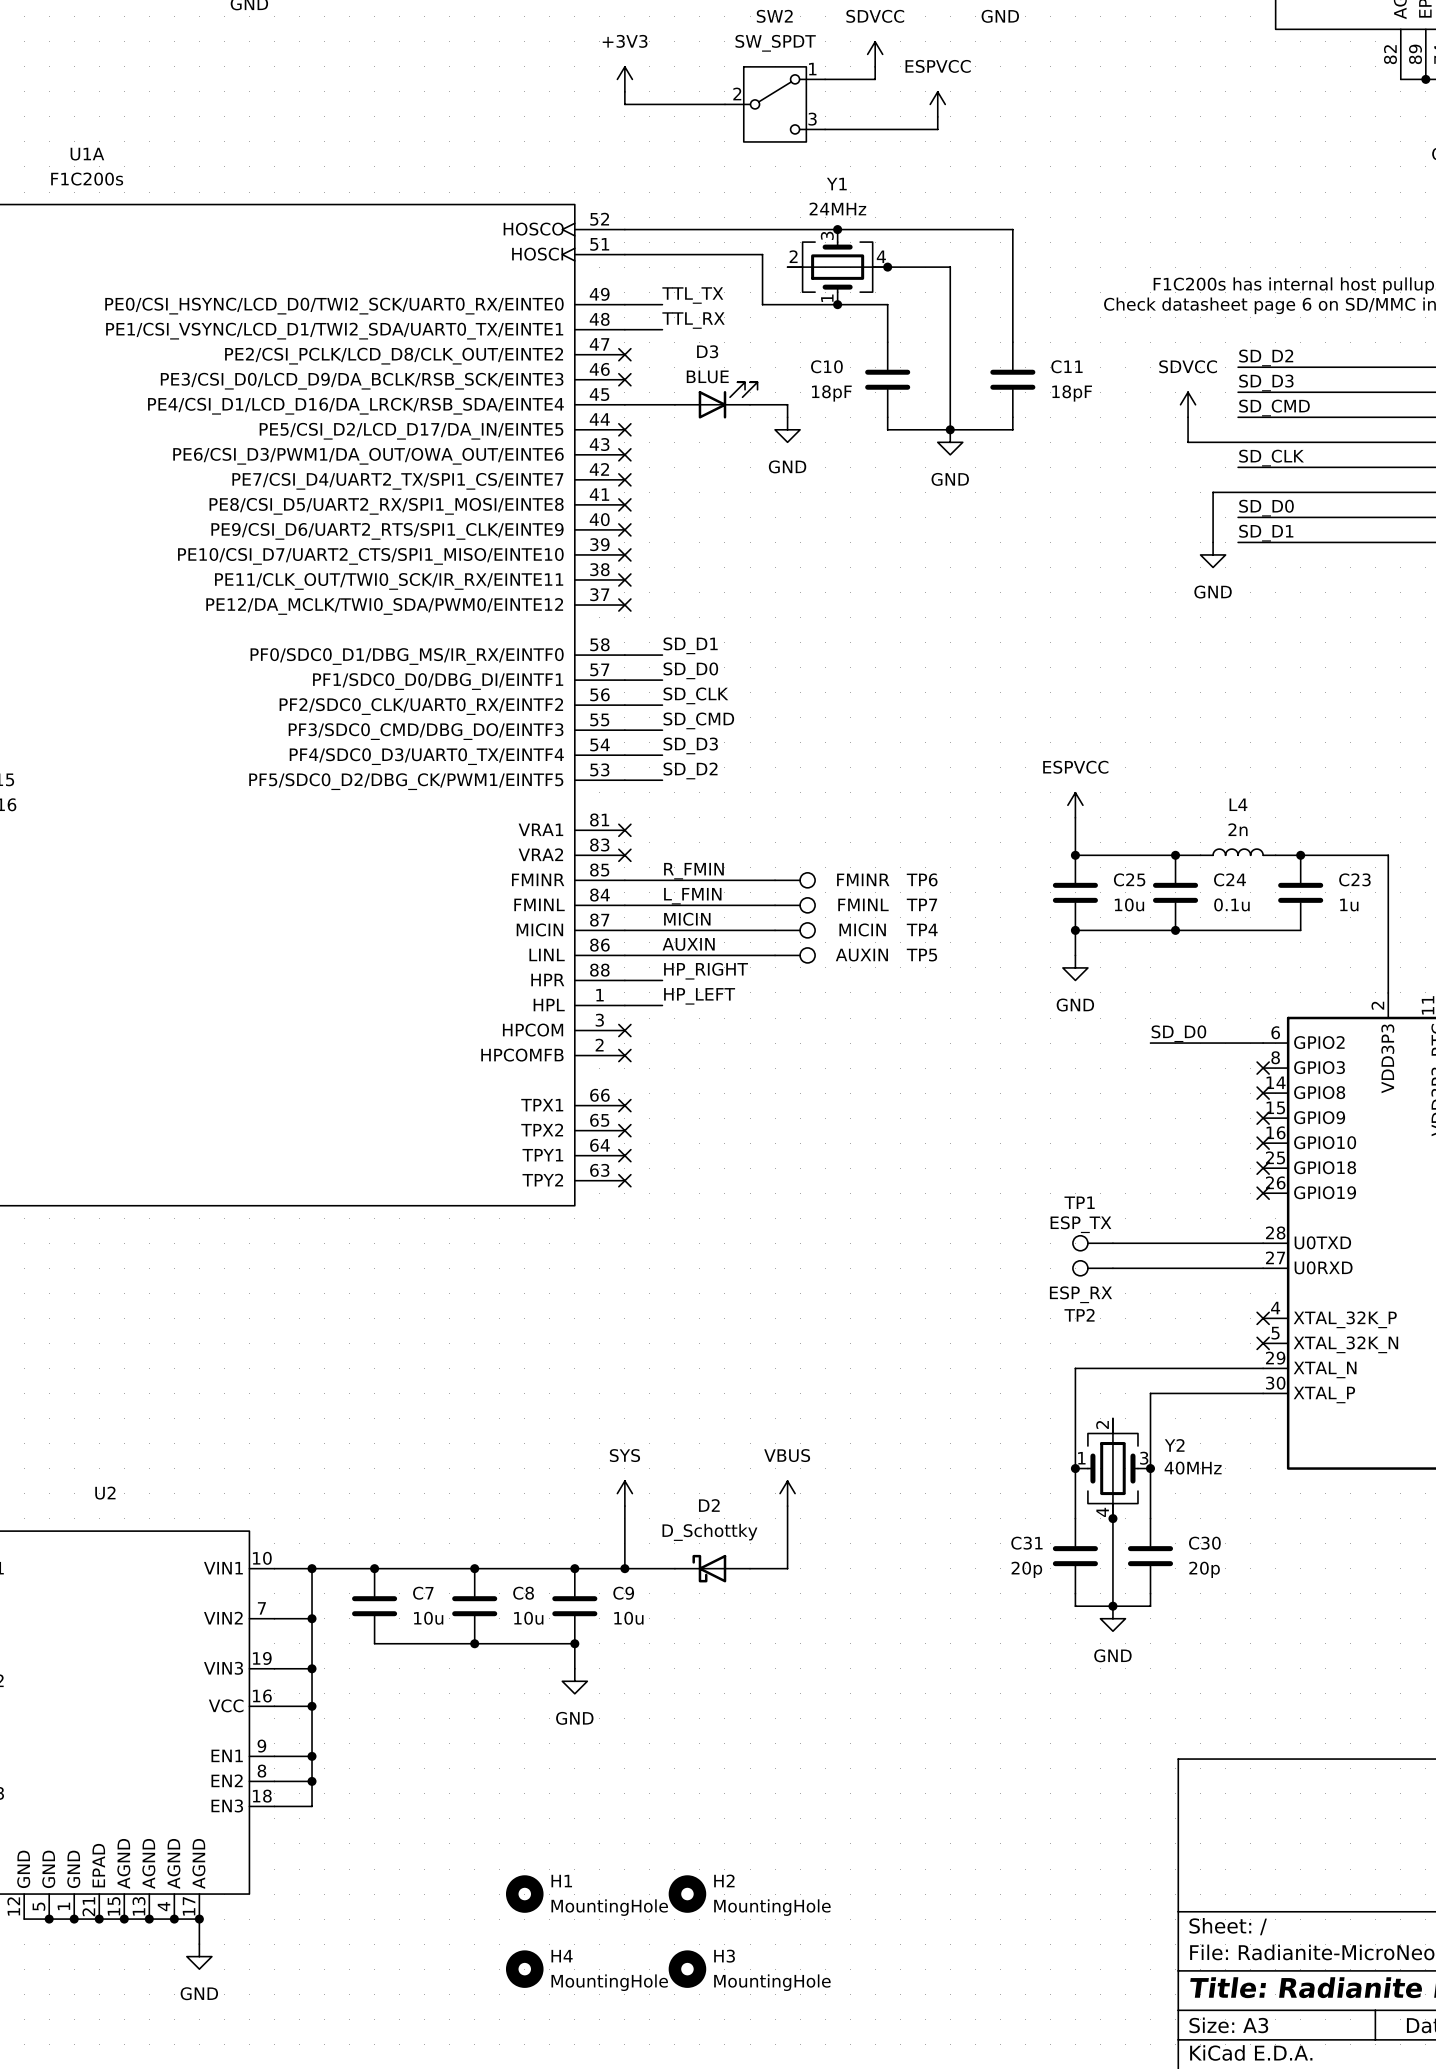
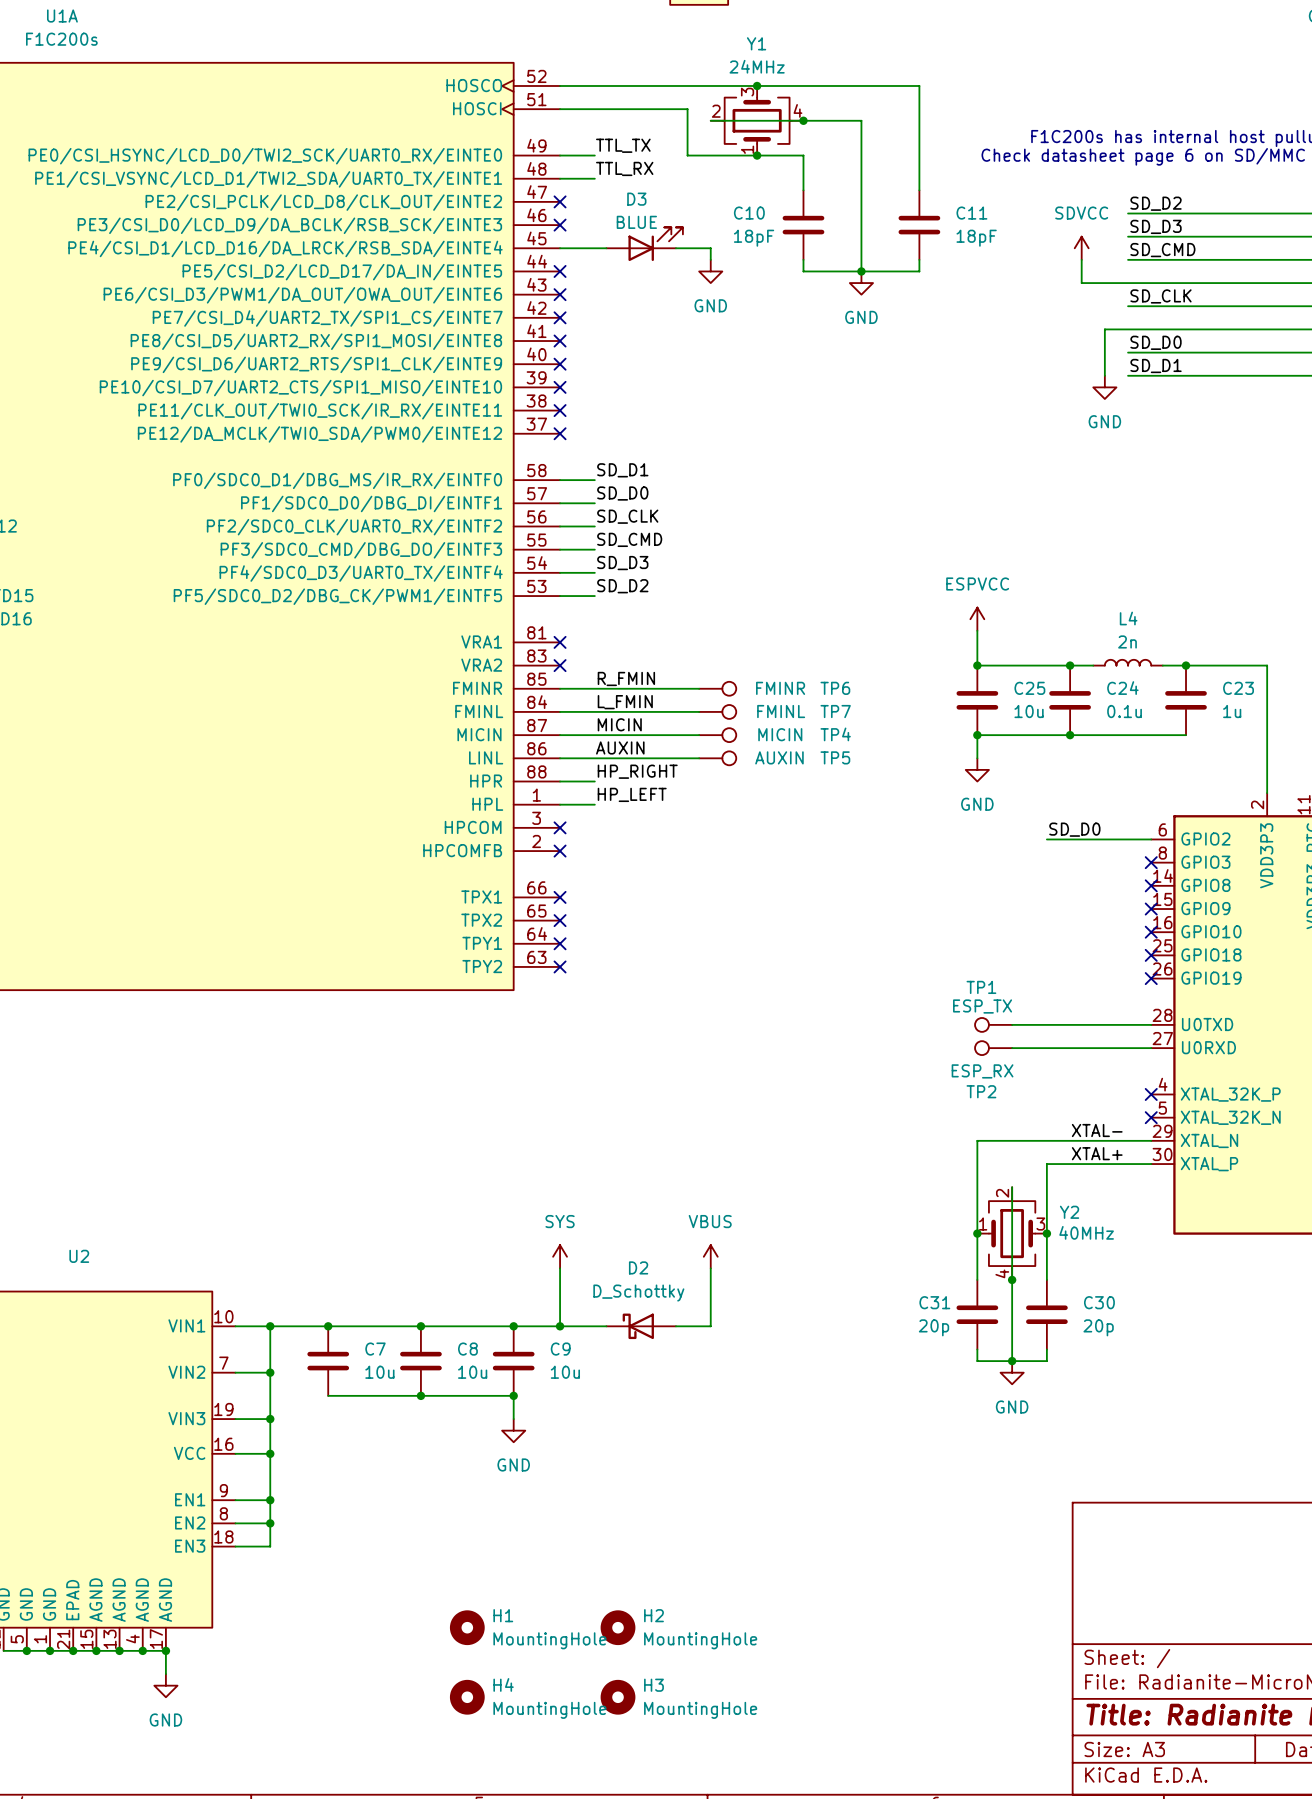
label: none -> XTAL- (1097, 1130)
label: none -> XTAL+ (1097, 1153)

